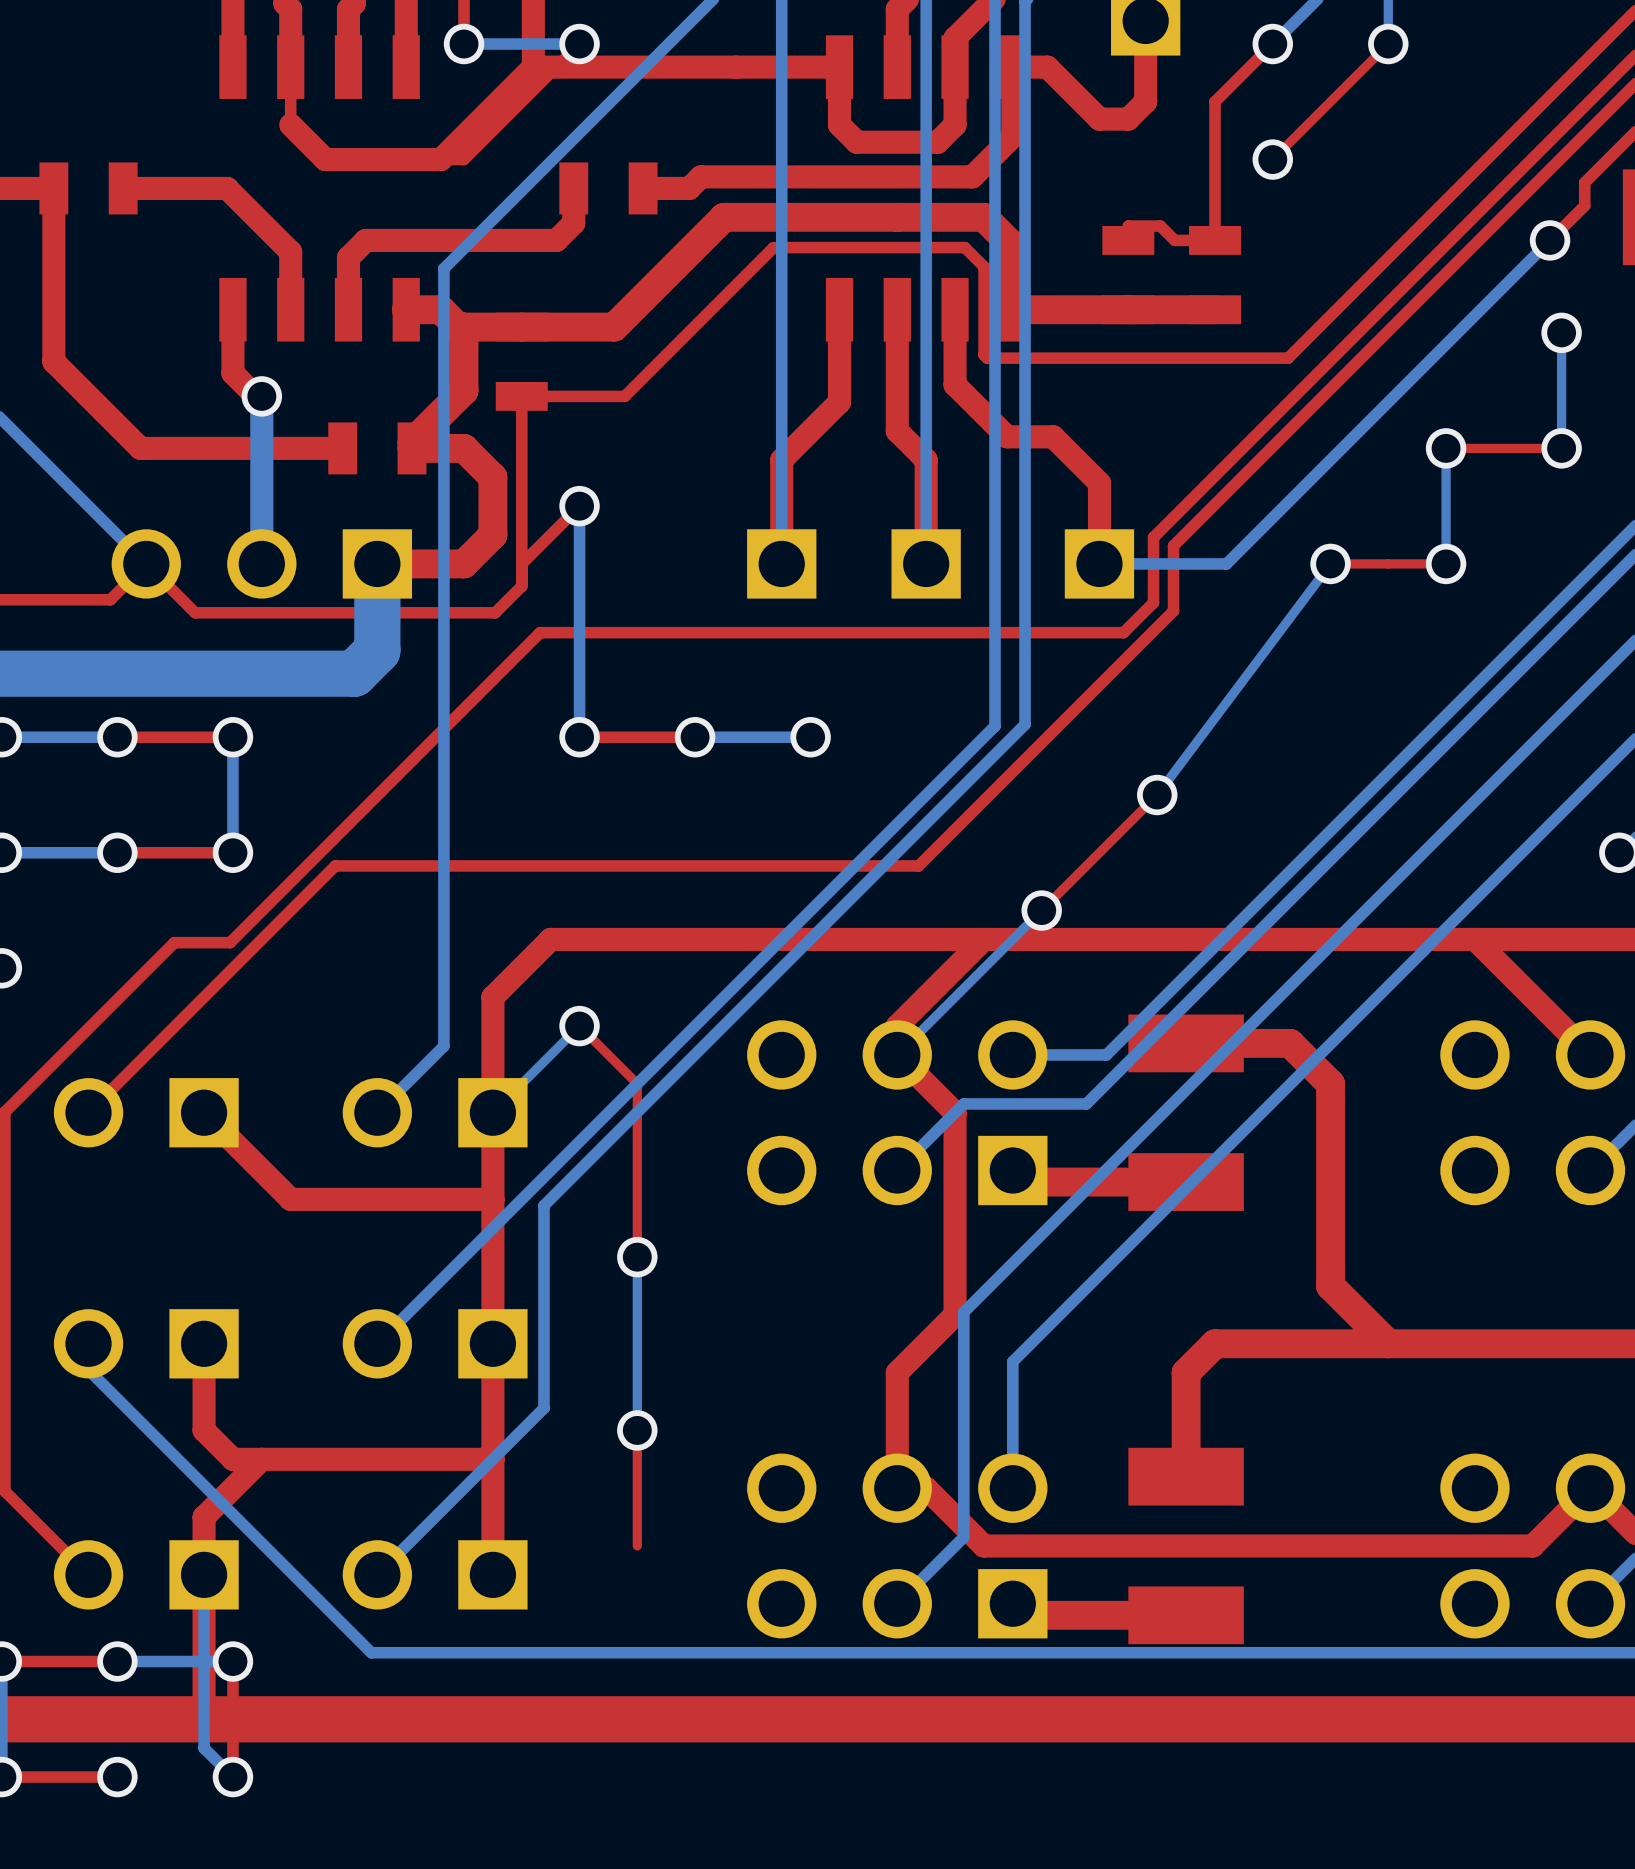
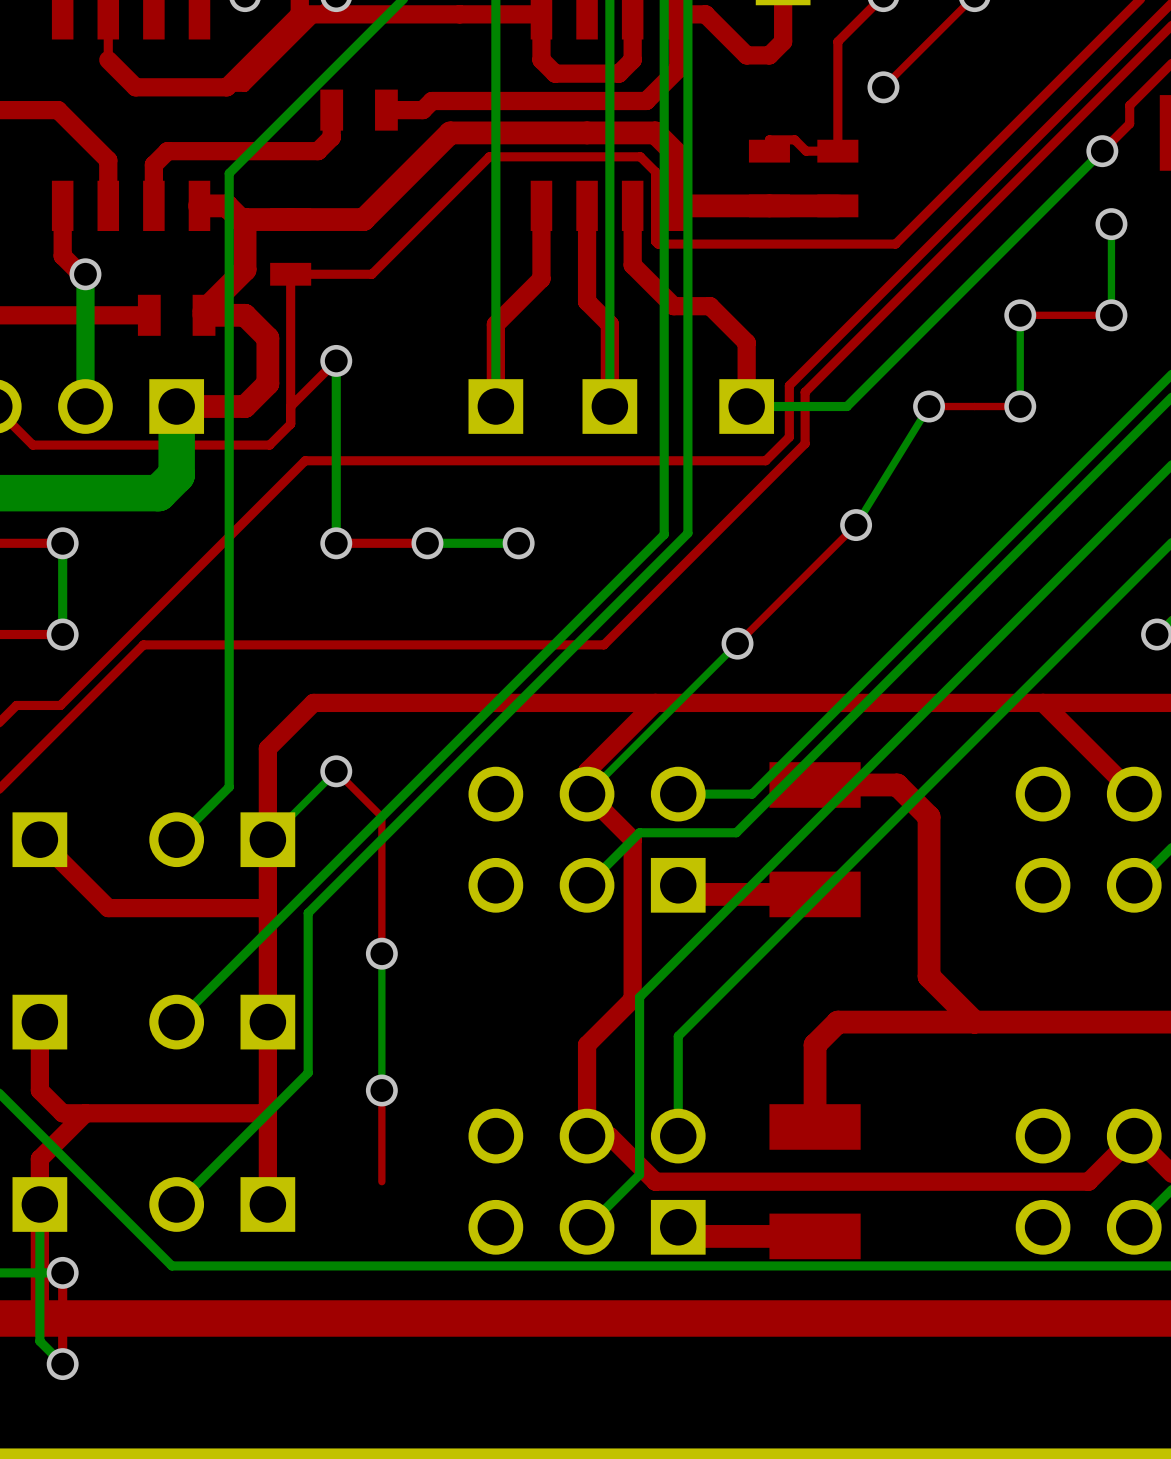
bottom track: (1330, 563) (1157, 795) -> (929, 406) (856, 525)
top track: none -> (856, 525) (792, 588)
via: none -> (856, 525)
via: (1157, 795) -> none
bottom track: none -> (737, 643) (701, 680)
top track: (1087, 864) (1041, 910) -> none
via: none -> (737, 643)
via: (1041, 910) -> none

